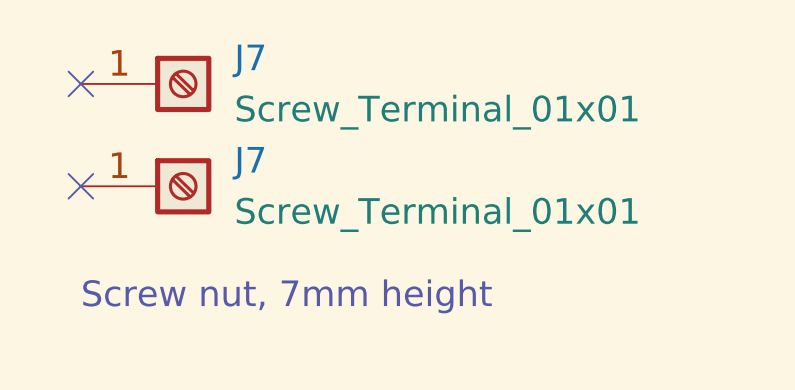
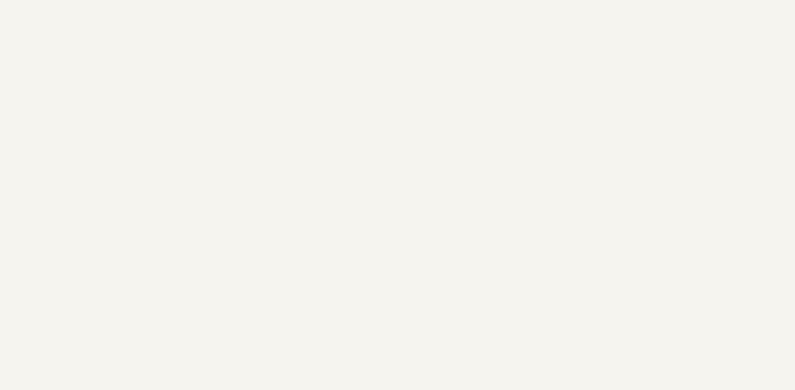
no-connect mark: (80, 83) -> none
J7: Screw_Terminal_01x01 (146, 83) -> none
no-connect mark: (80, 186) -> none
J7: Screw_Terminal_01x01 (146, 186) -> none
text: Screw nut, 7mm height (287, 296) -> none

